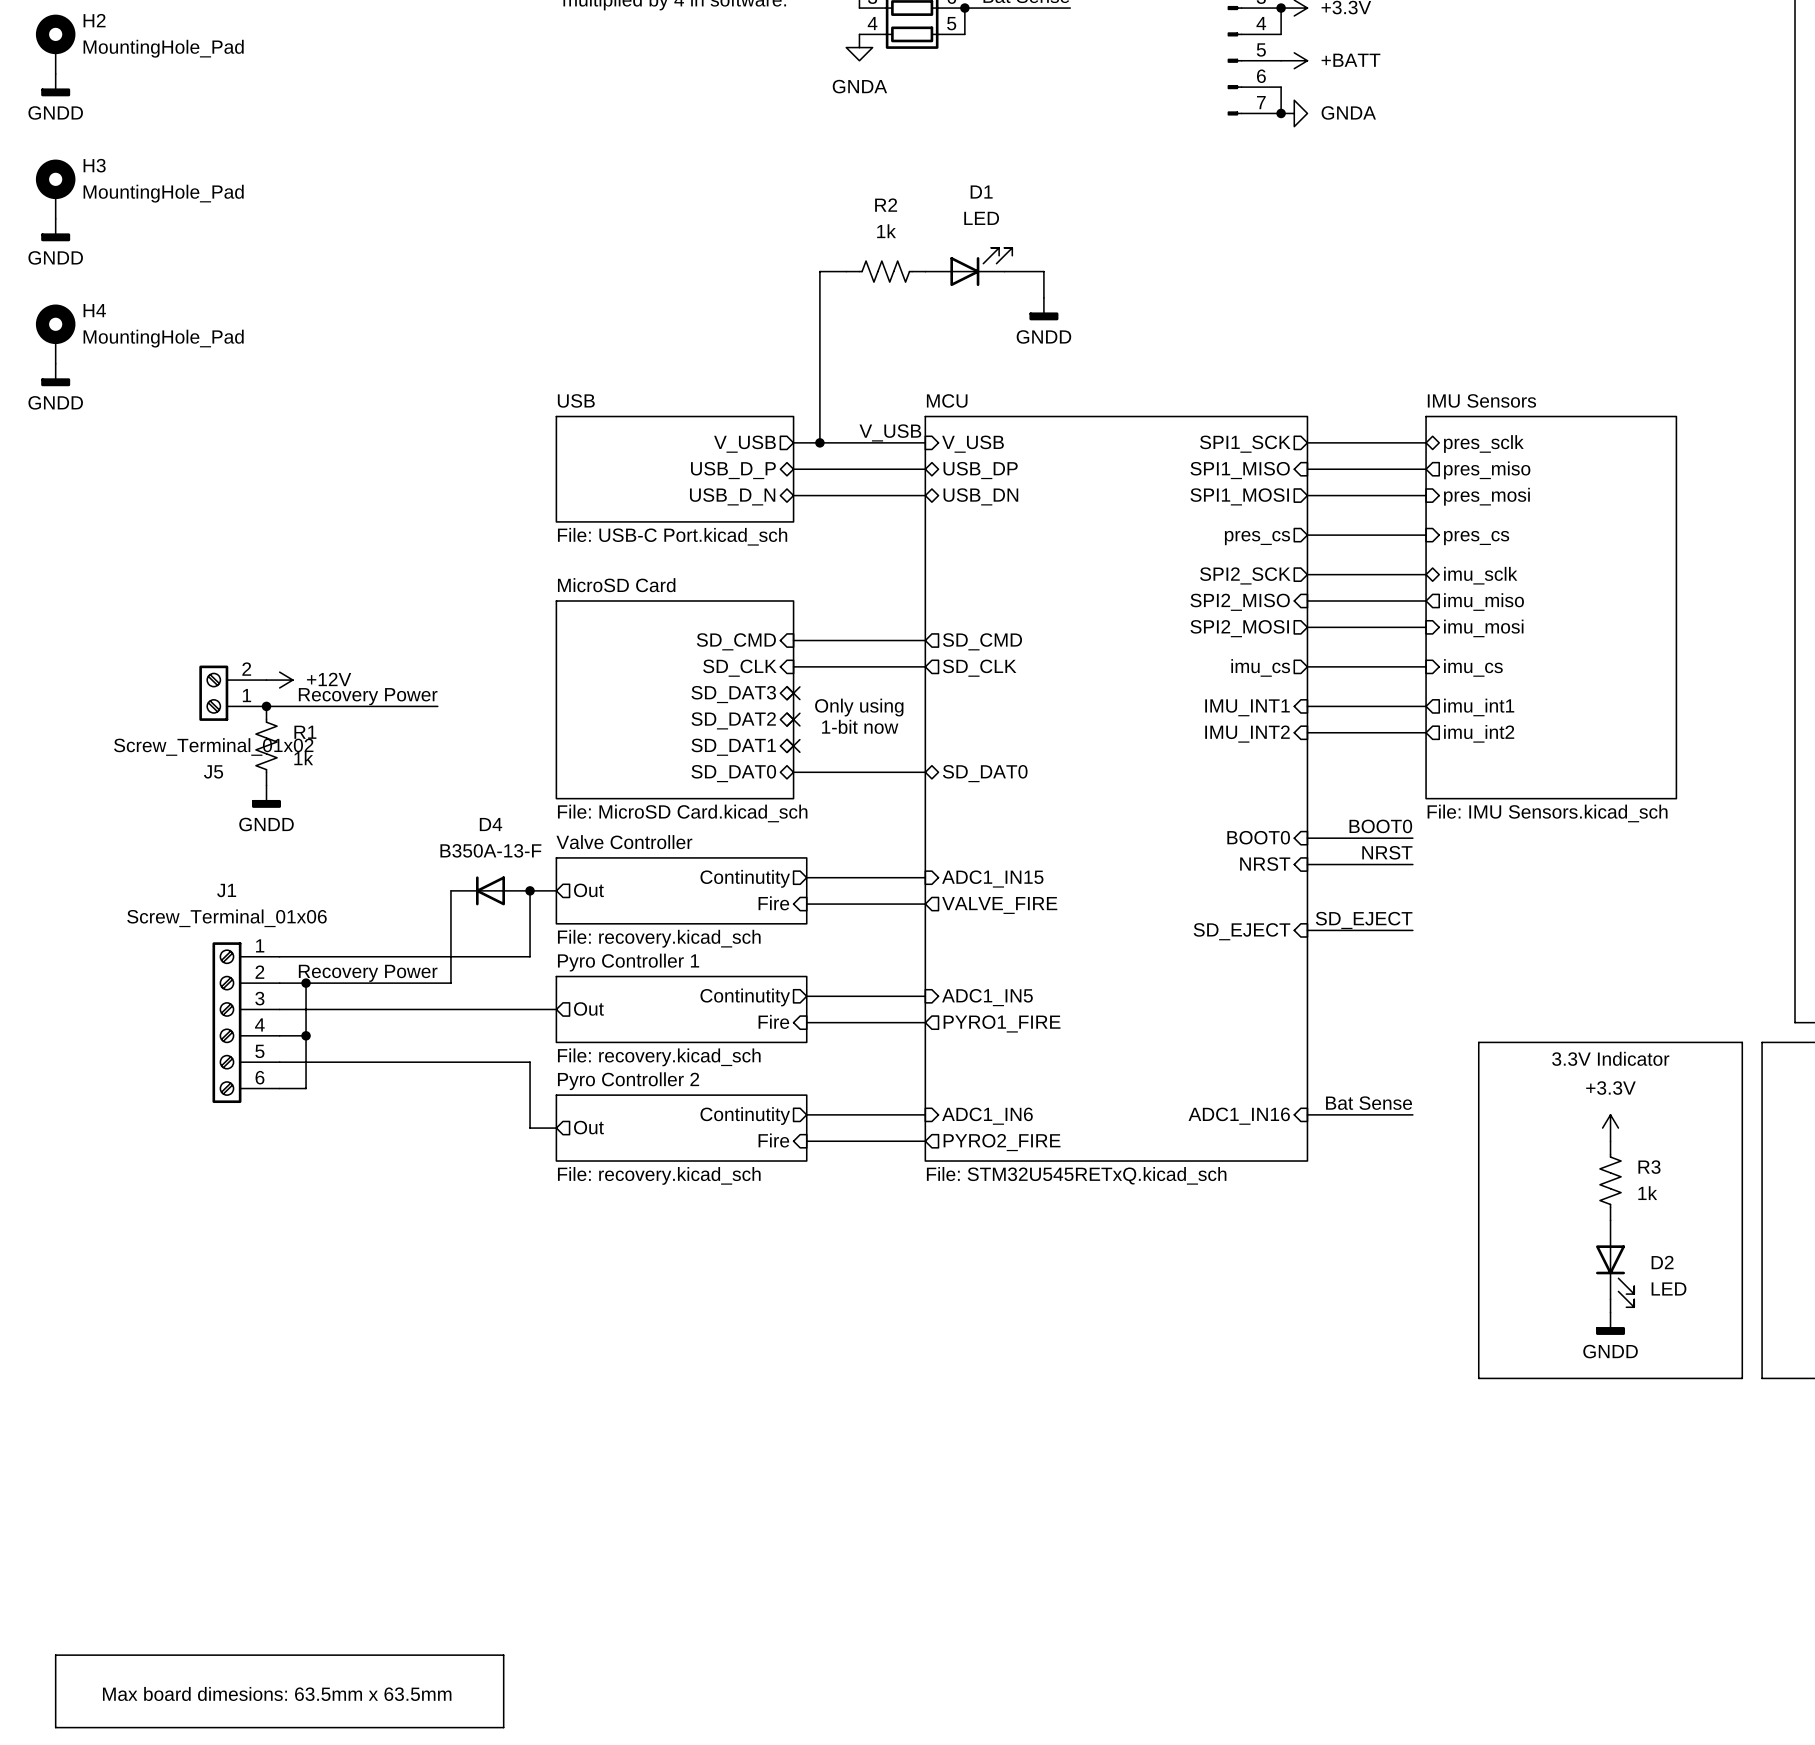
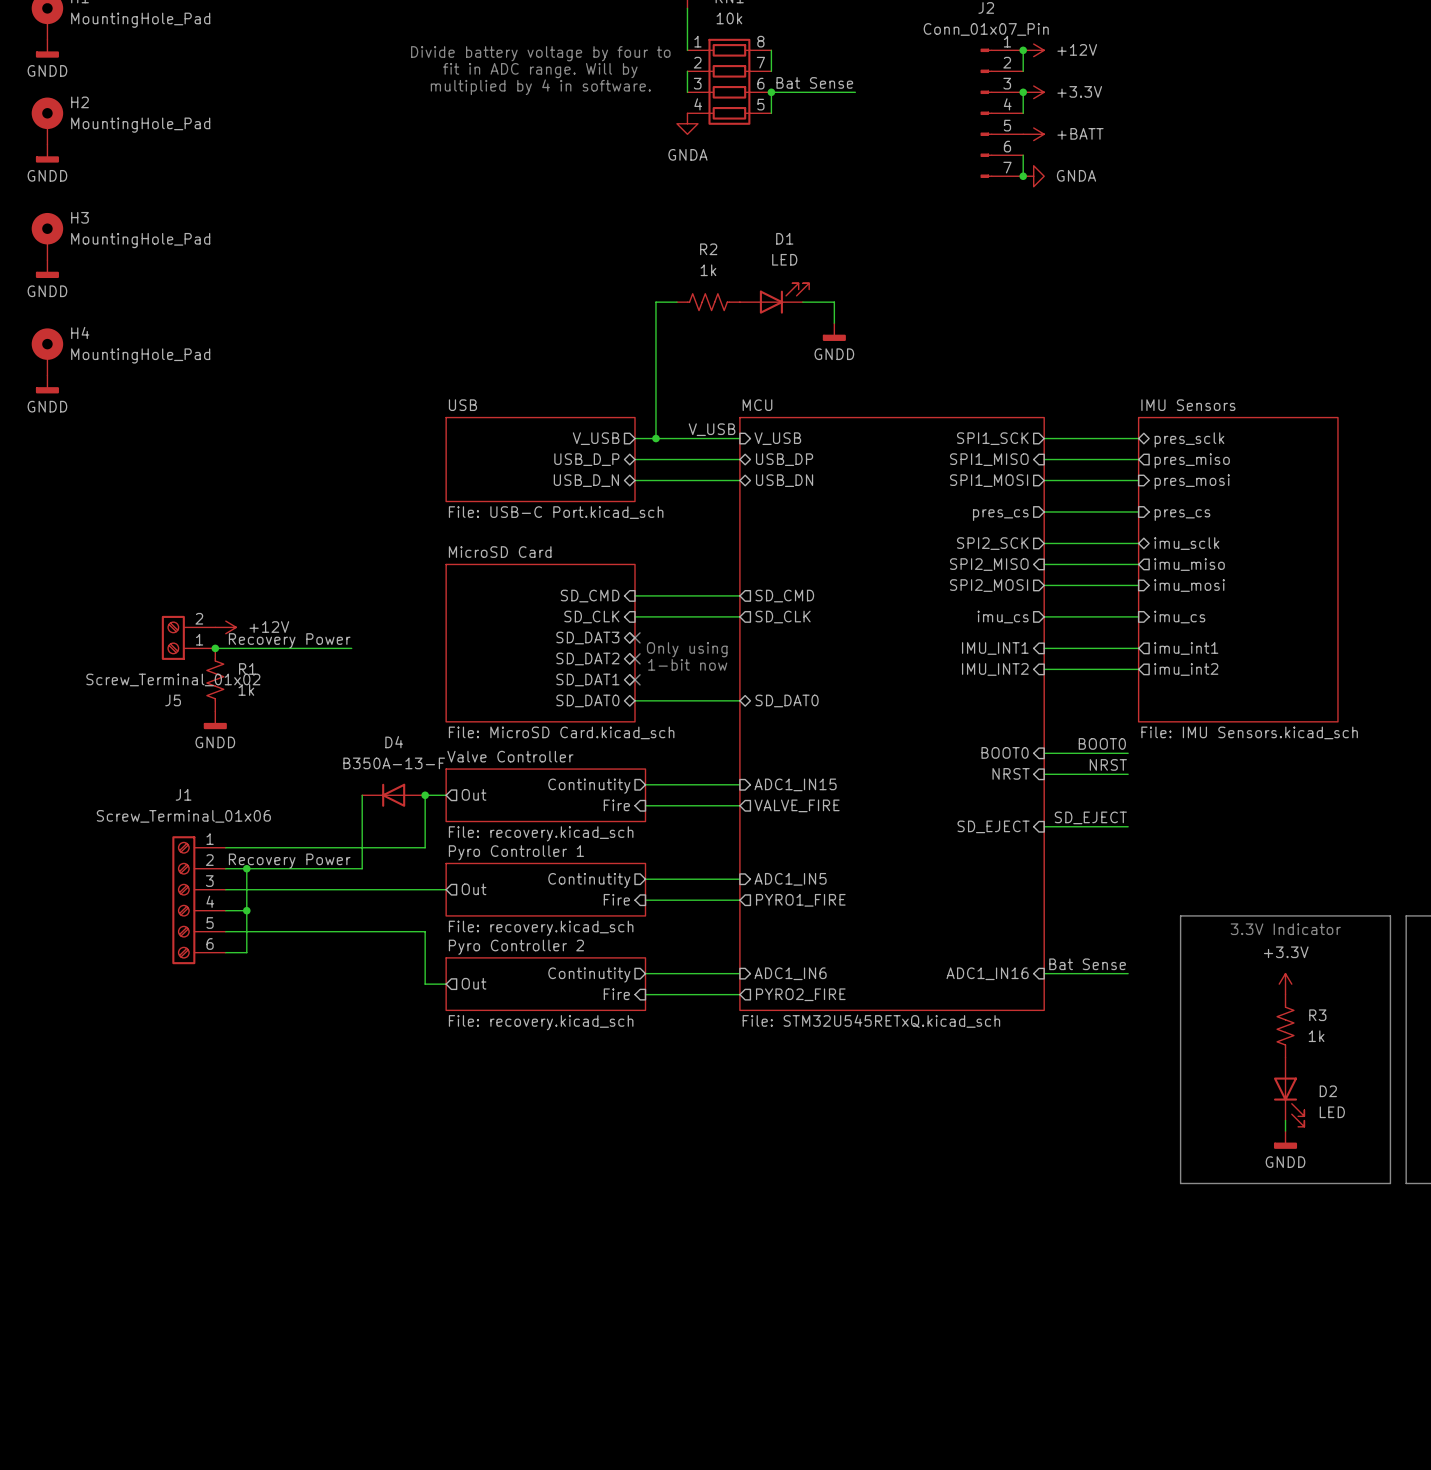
line: (55, 1655) (503, 1655) (503, 1727) (55, 1727) (55, 1655) -> none
text: Max board dimesions: 63.5mm x 63.5mm (277, 1693) -> none

